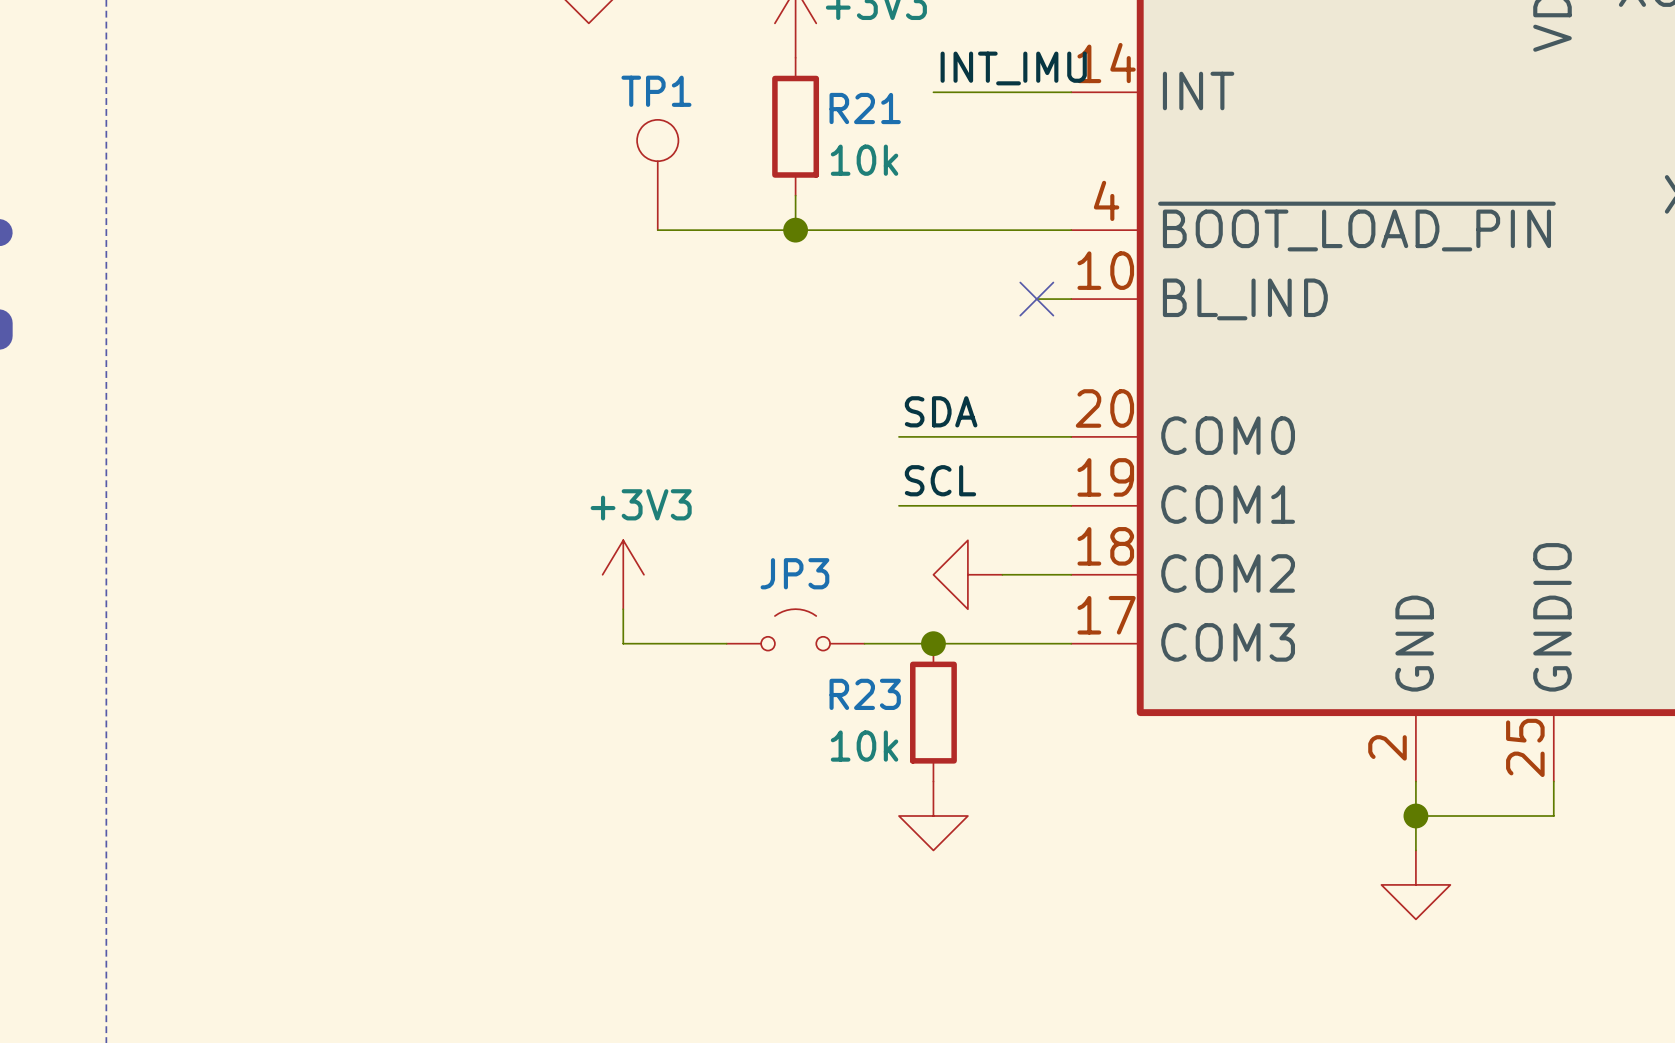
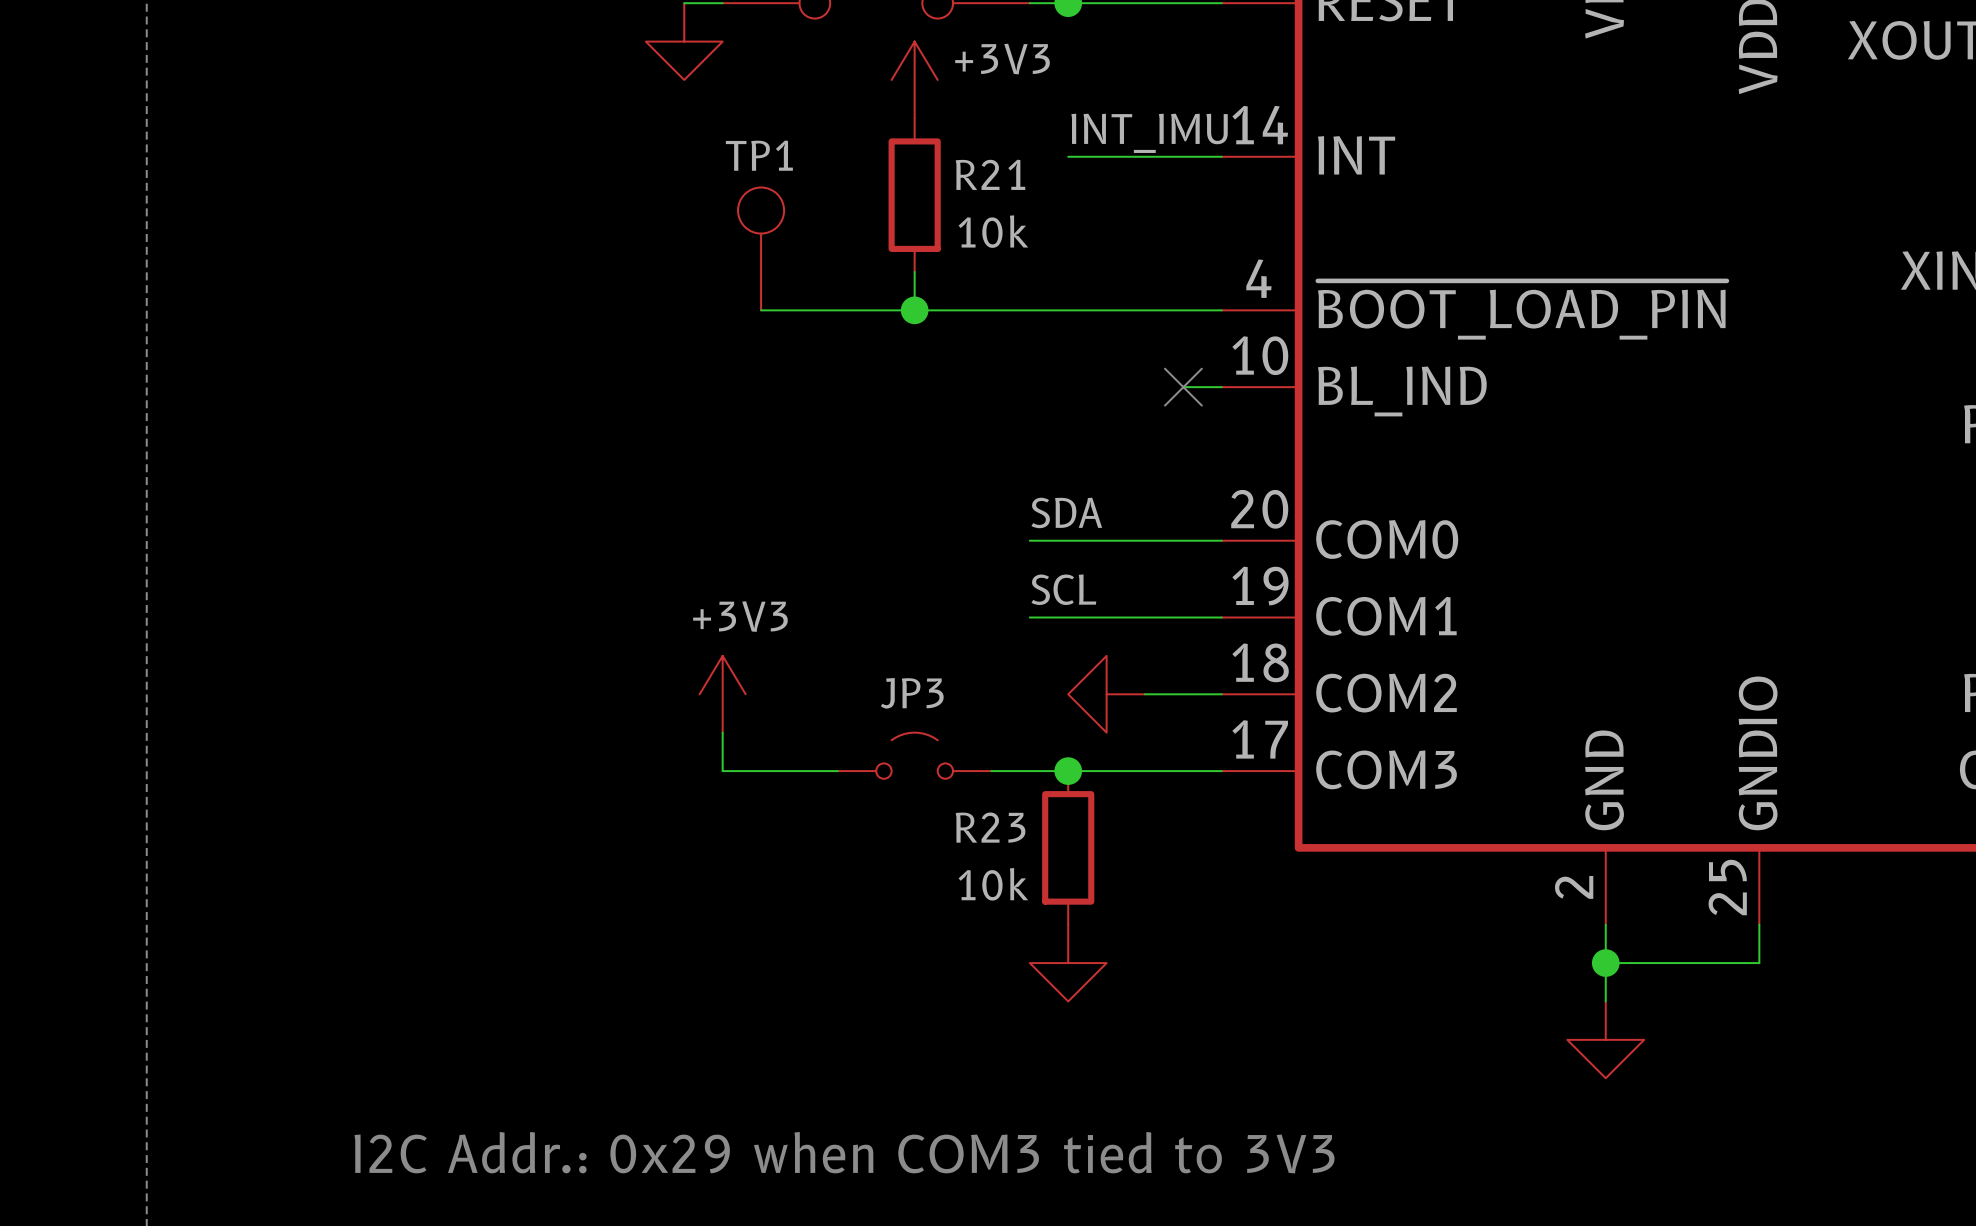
text: none -> I2C Addr.: 0x29 when COM3 tied to 3V3 (844, 1152)

